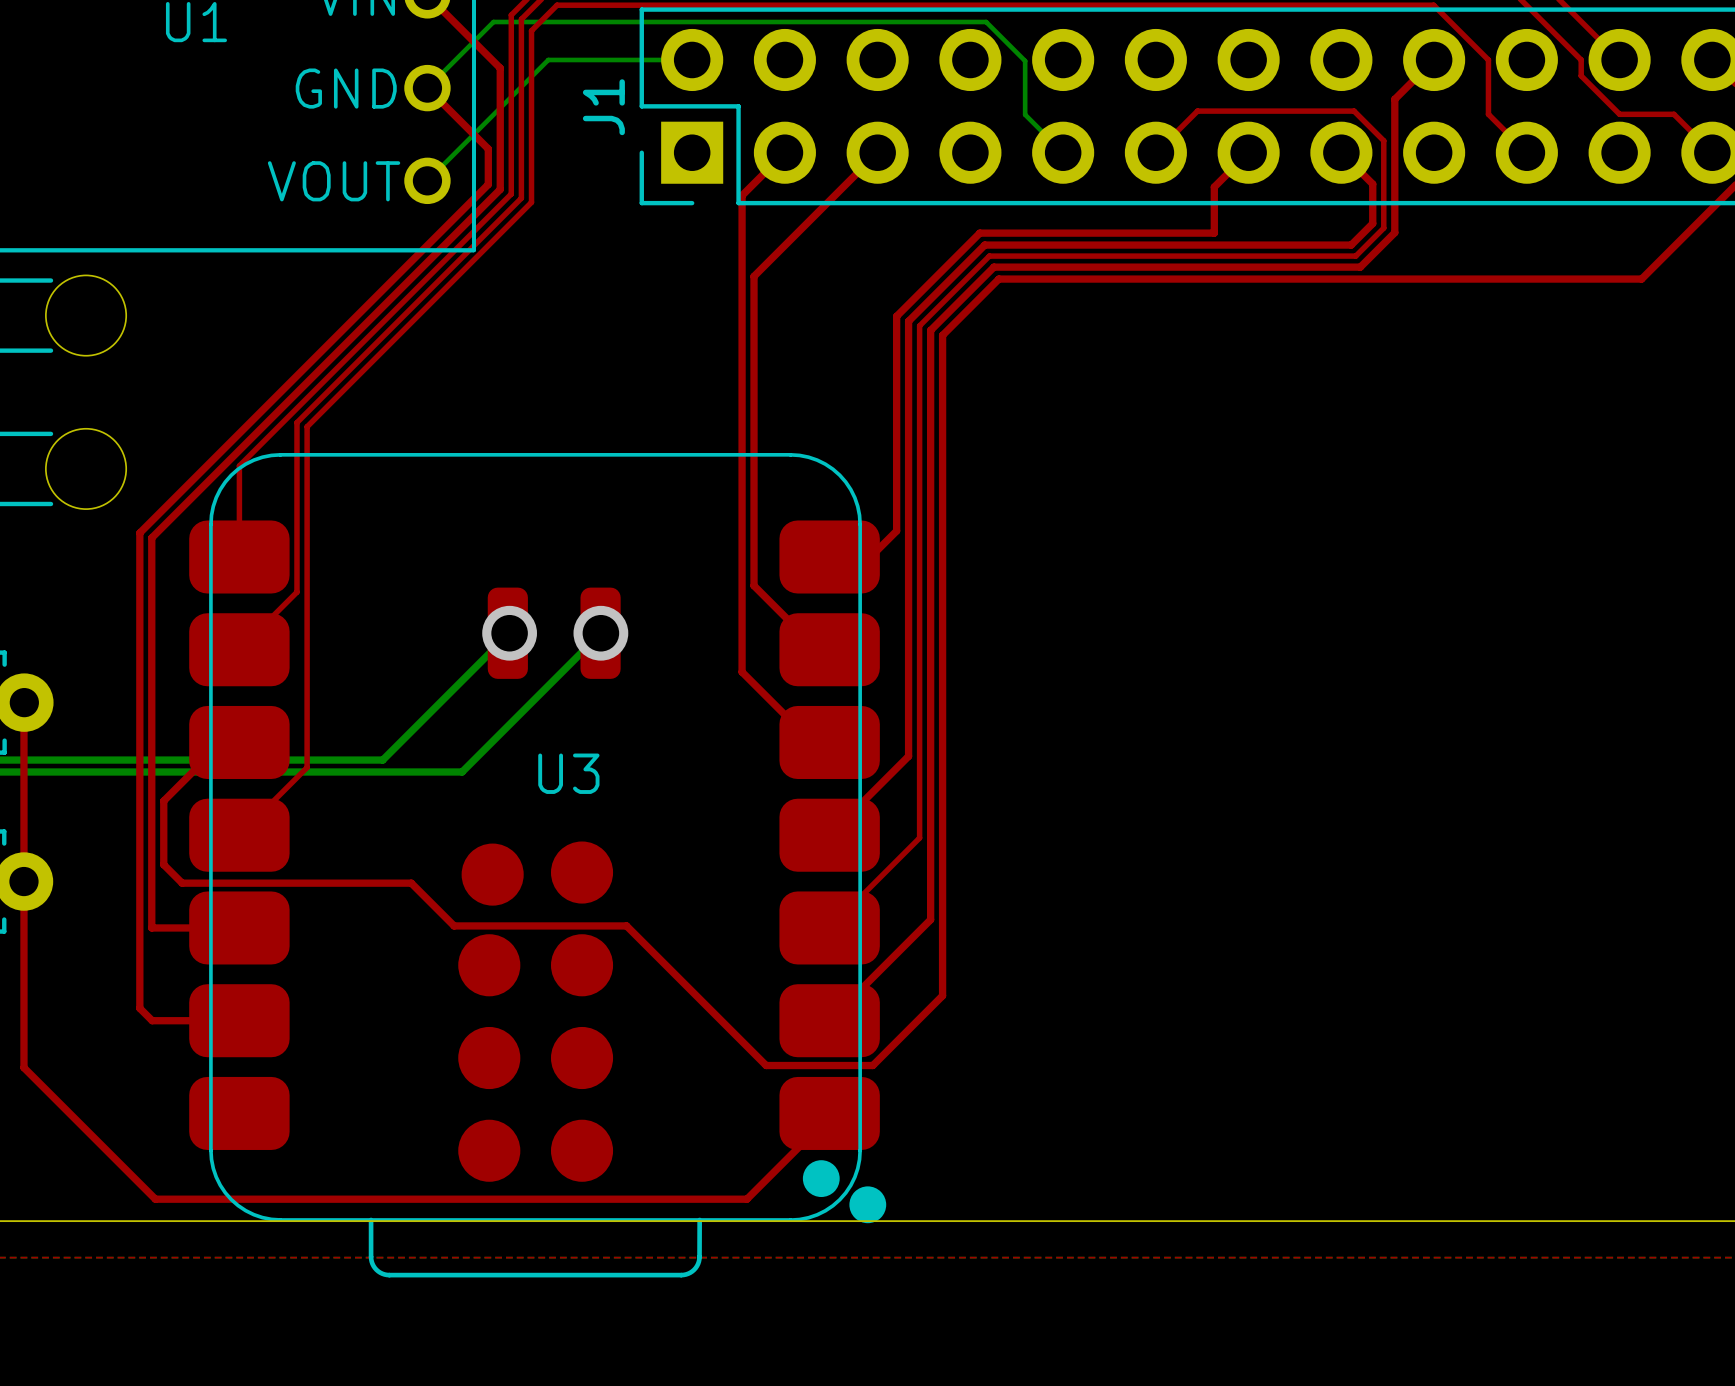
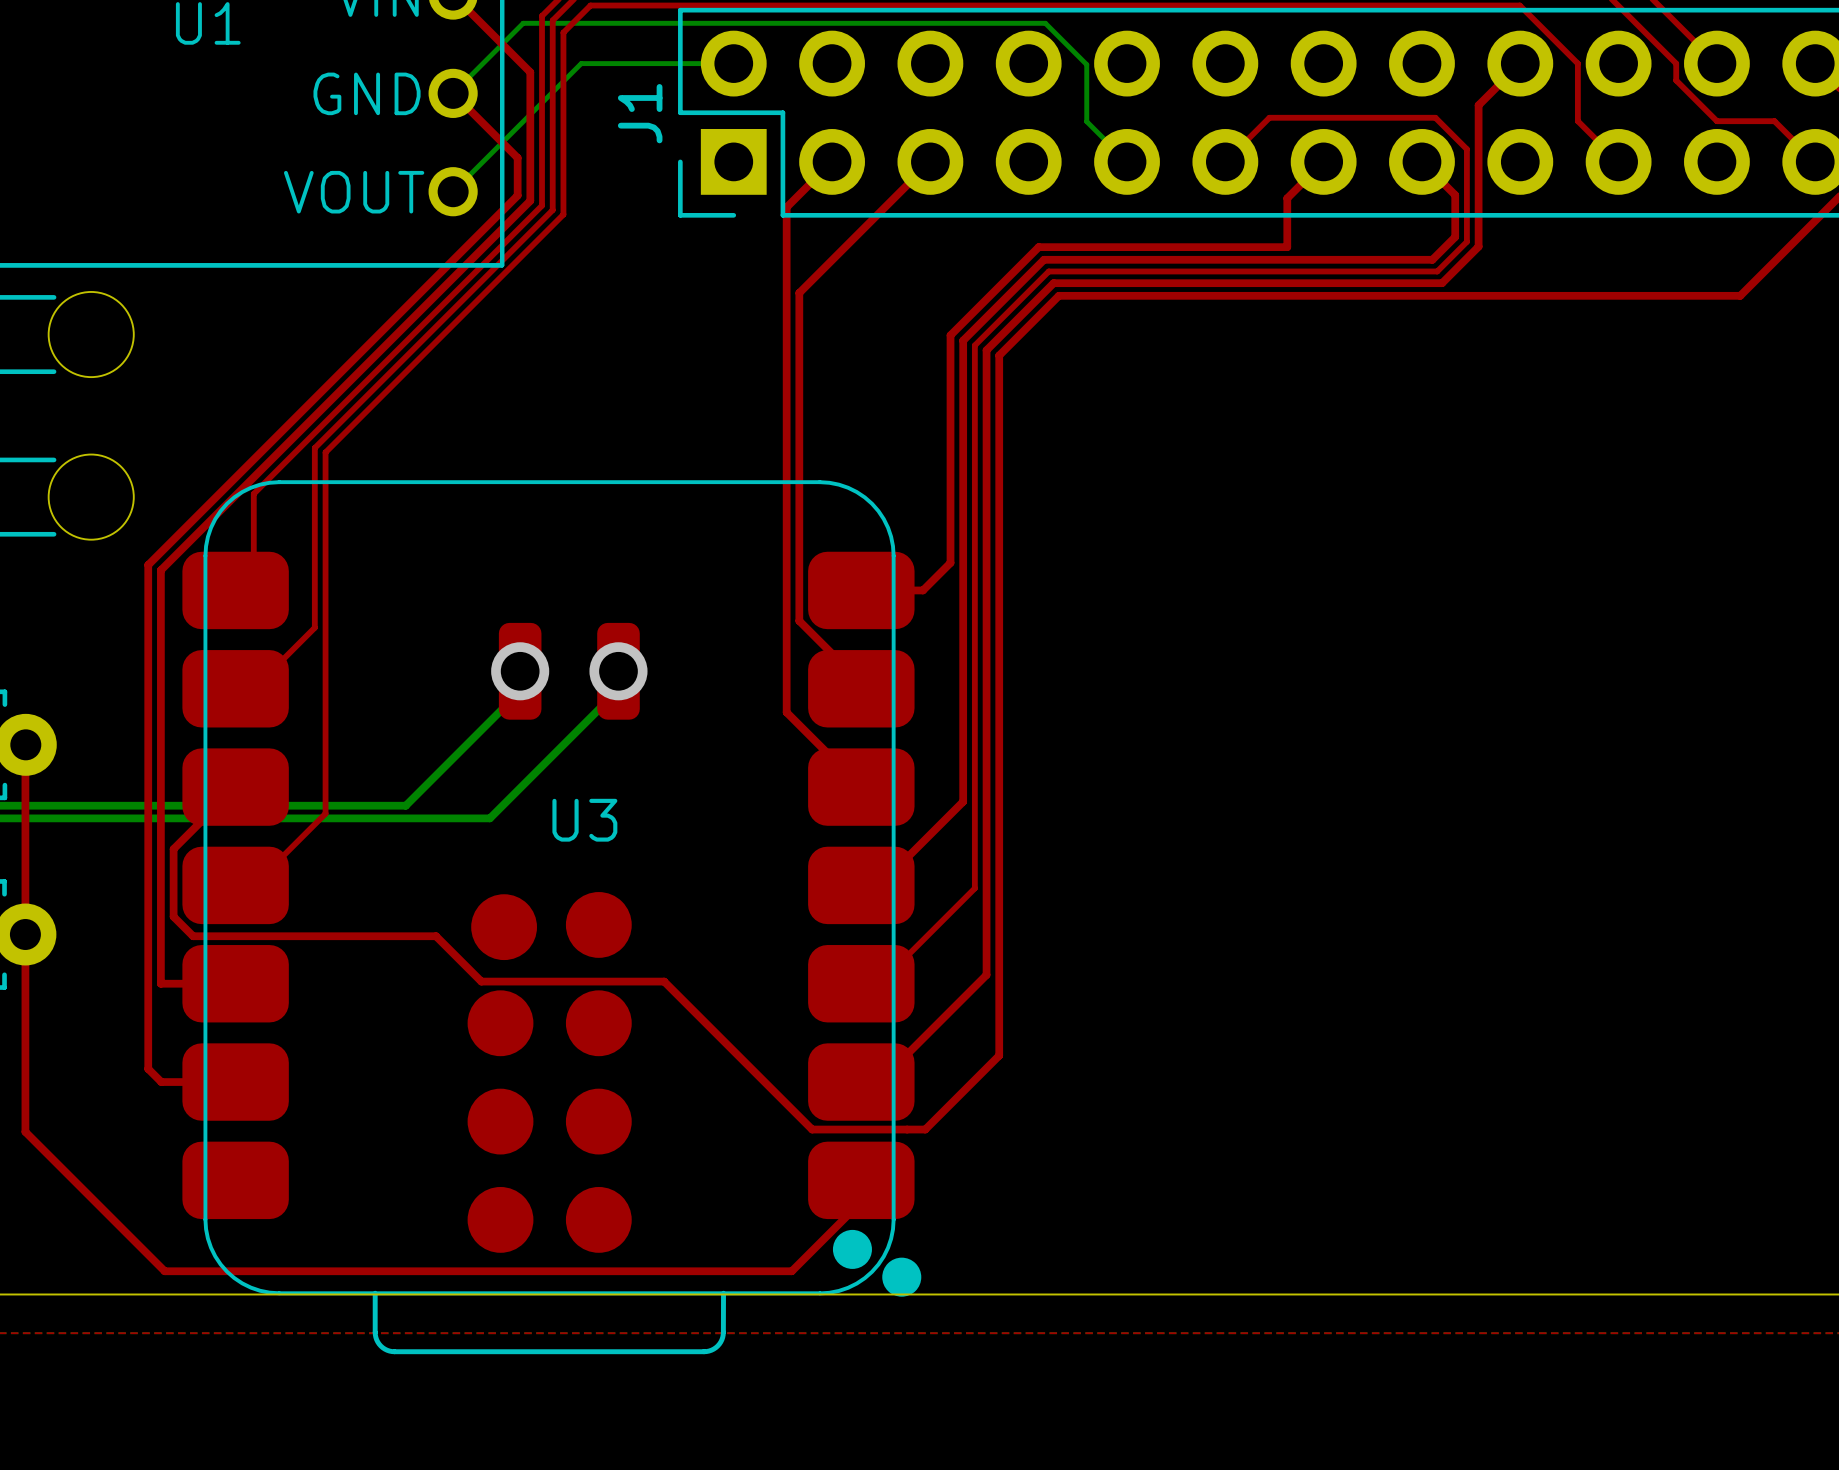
via position: (509, 633) -> (520, 671)
via position: (600, 633) -> (618, 671)
U3 position: (537, 865) -> (551, 917)

